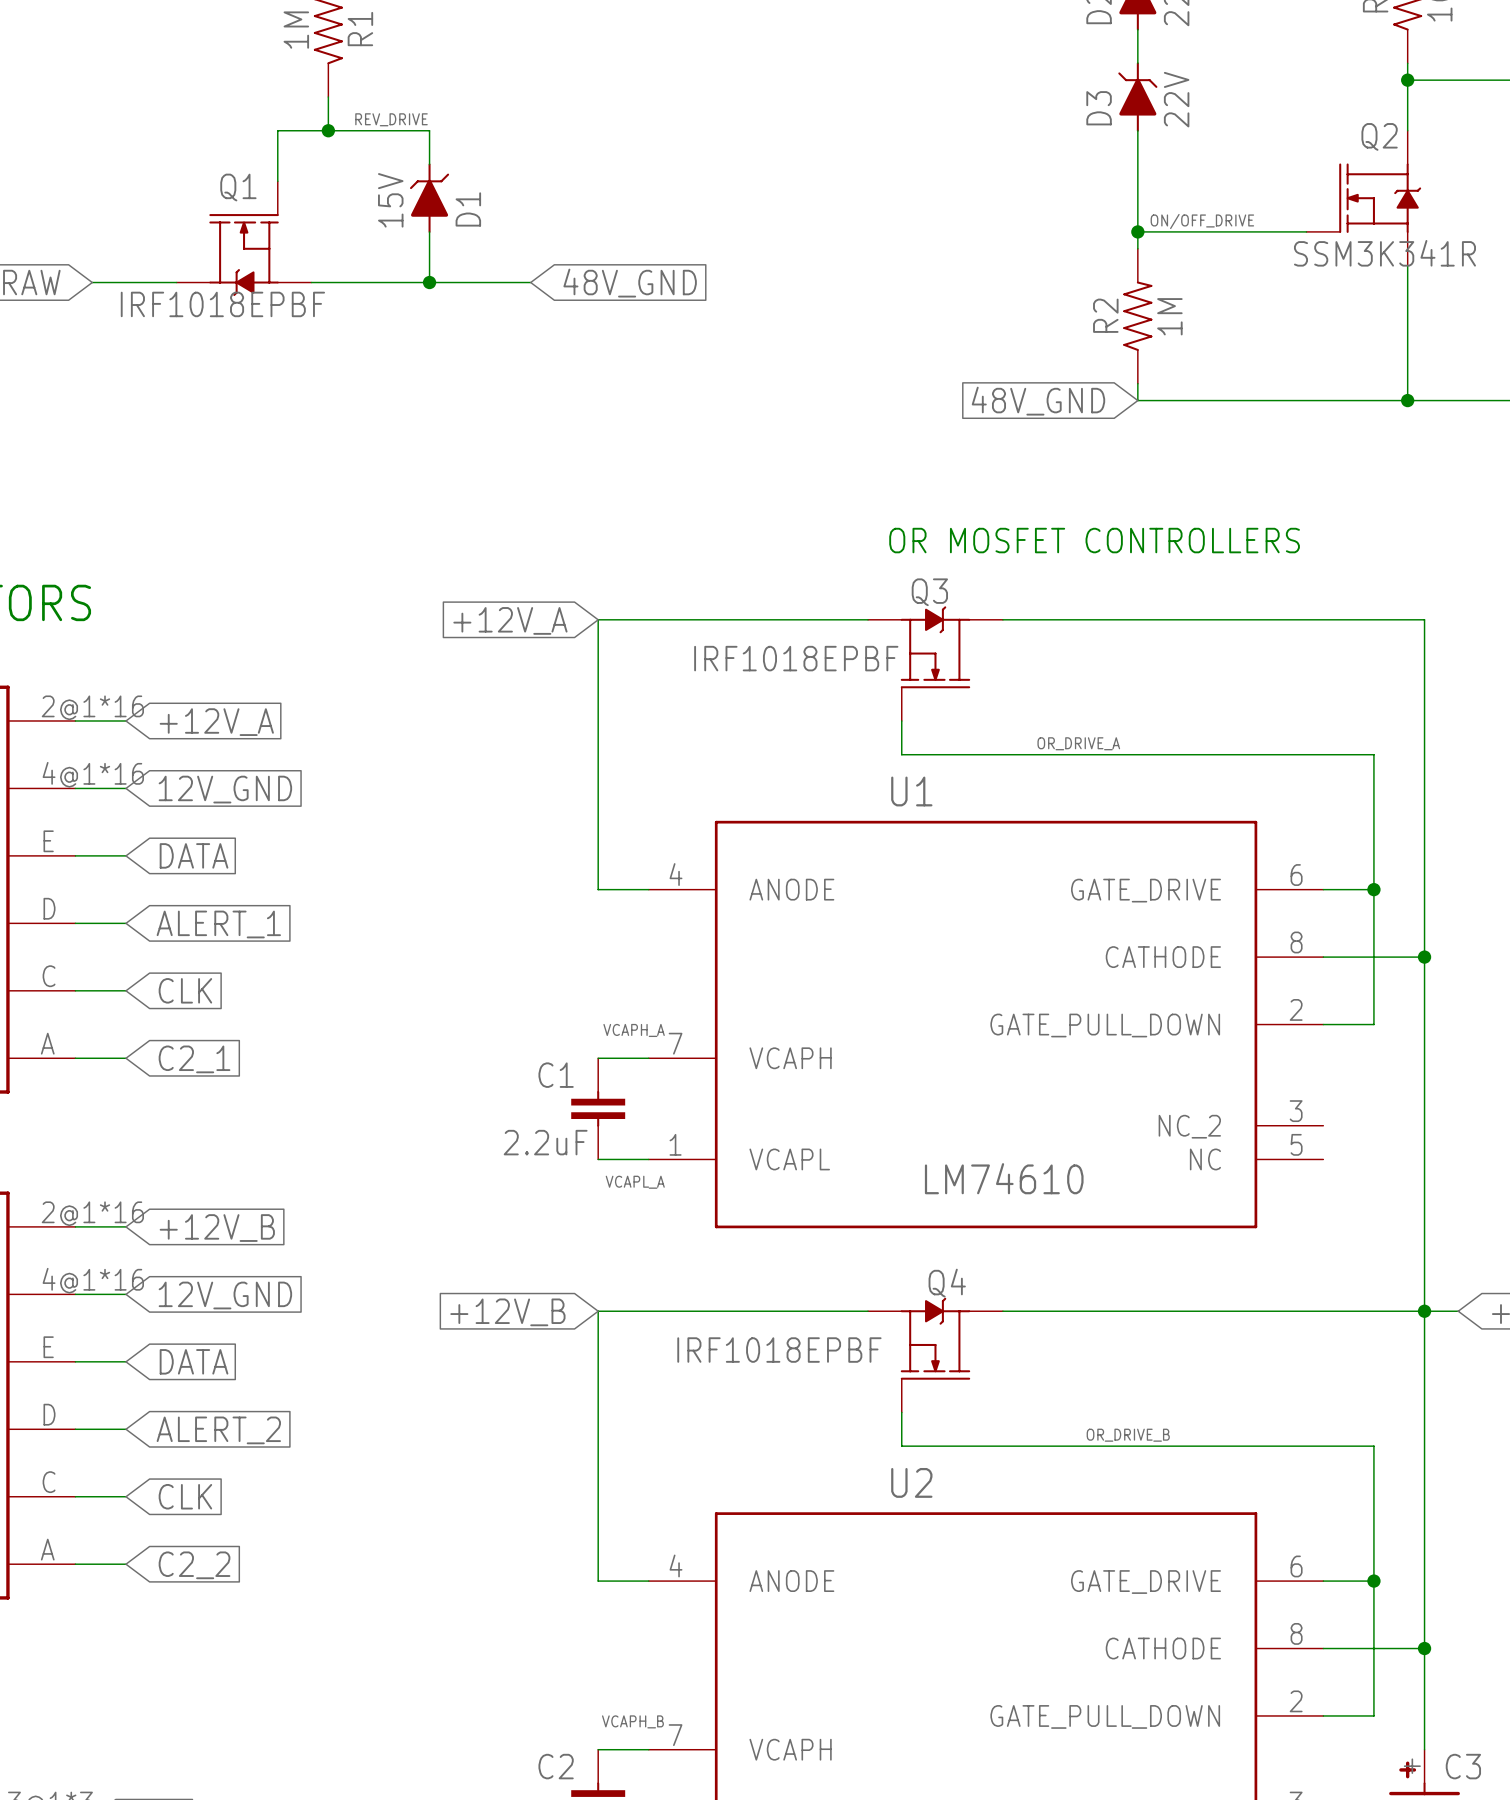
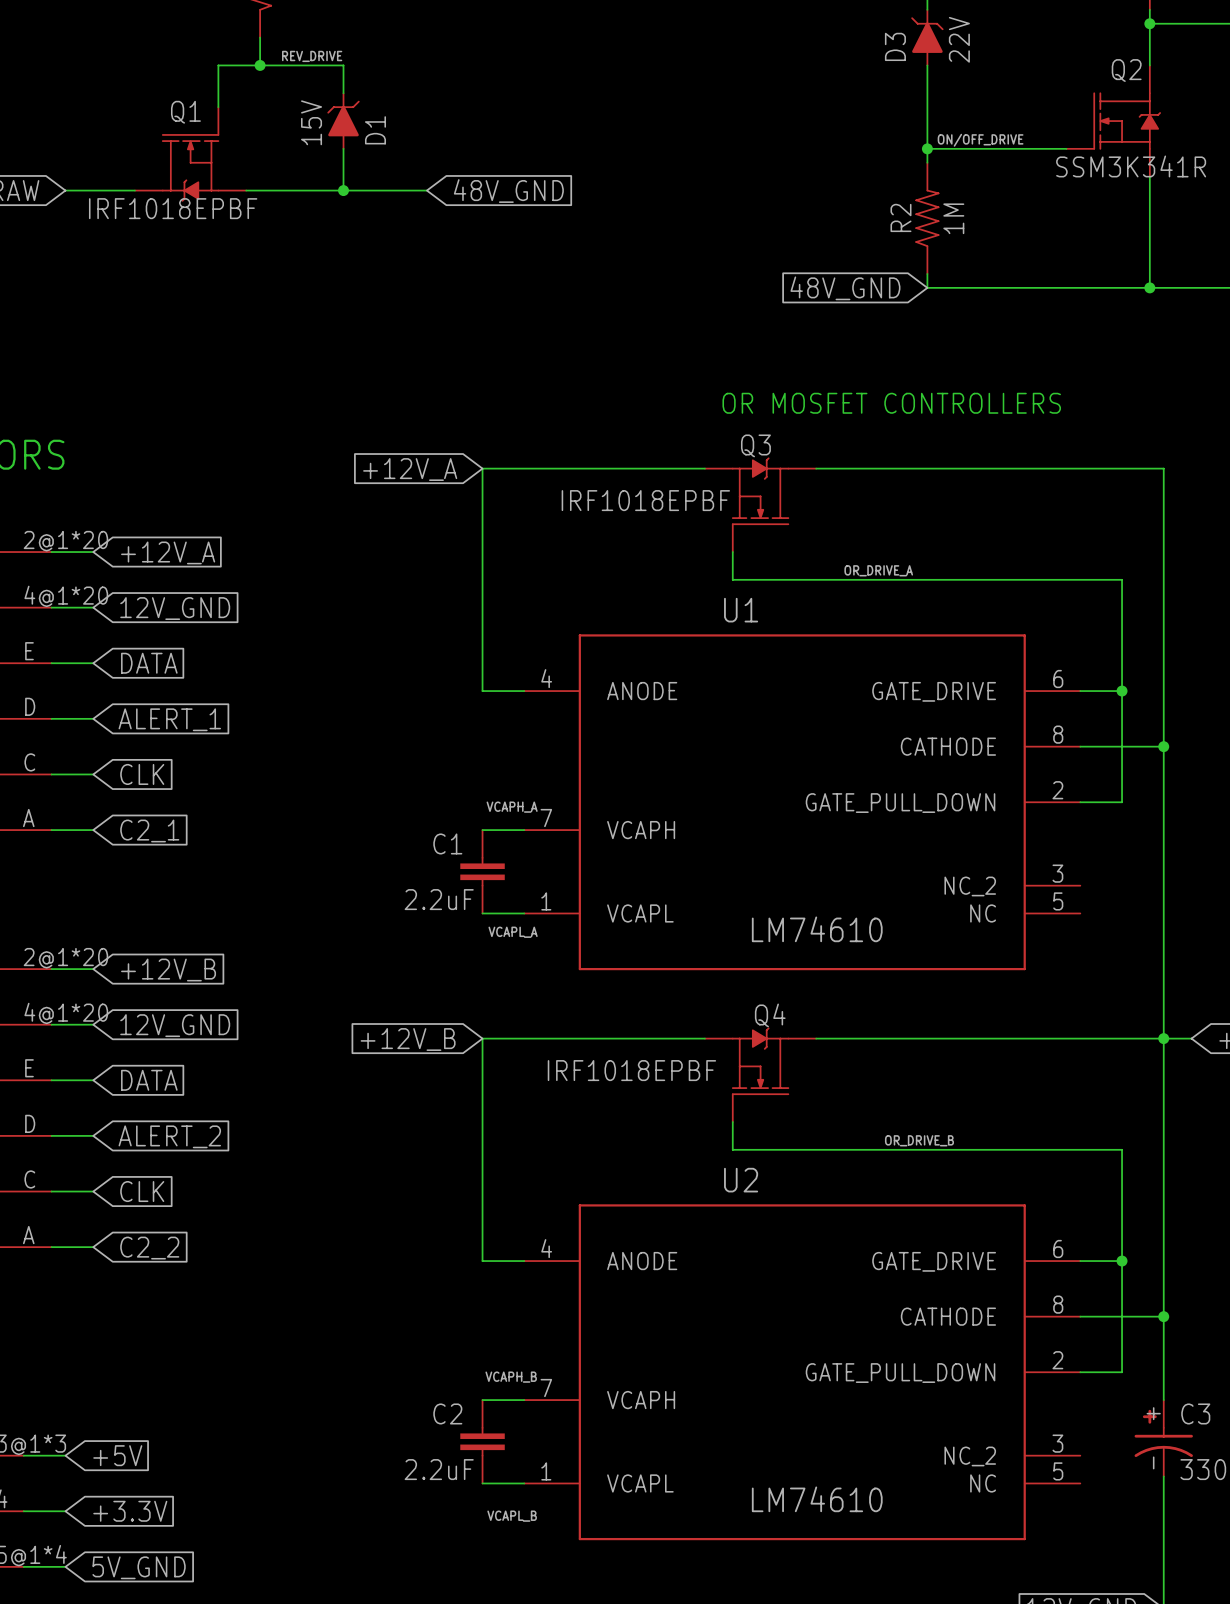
part pin number: 2@1*16 (92, 707) -> 2@1*20 (65, 541)
part pin number: 4@1*16 (93, 774) -> 4@1*20 (66, 596)
part pin number: 2@1*16 (92, 1213) -> 2@1*20 (65, 958)
part pin number: 4@1*16 (93, 1280) -> 4@1*20 (66, 1013)

